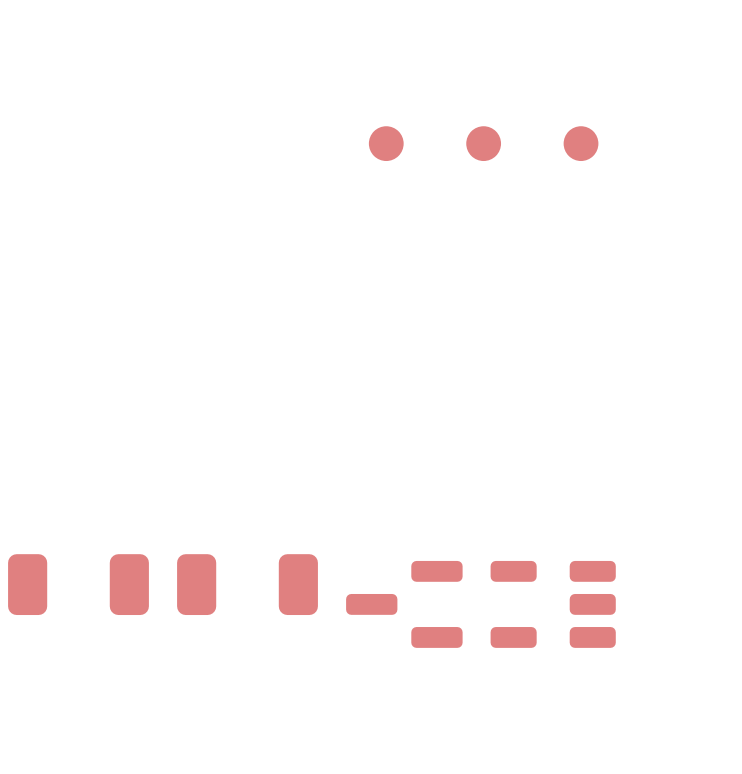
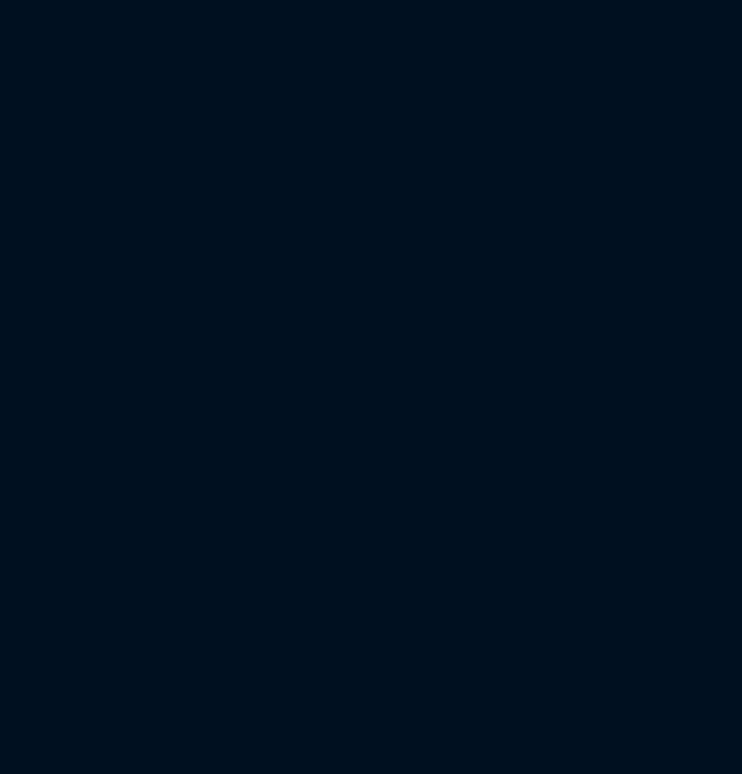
part: (386, 143) -> none
part: (483, 143) -> none
part: (581, 143) -> none
part: (78, 584) -> none
part: (247, 584) -> none
part: (404, 604) -> none
part: (553, 604) -> none

